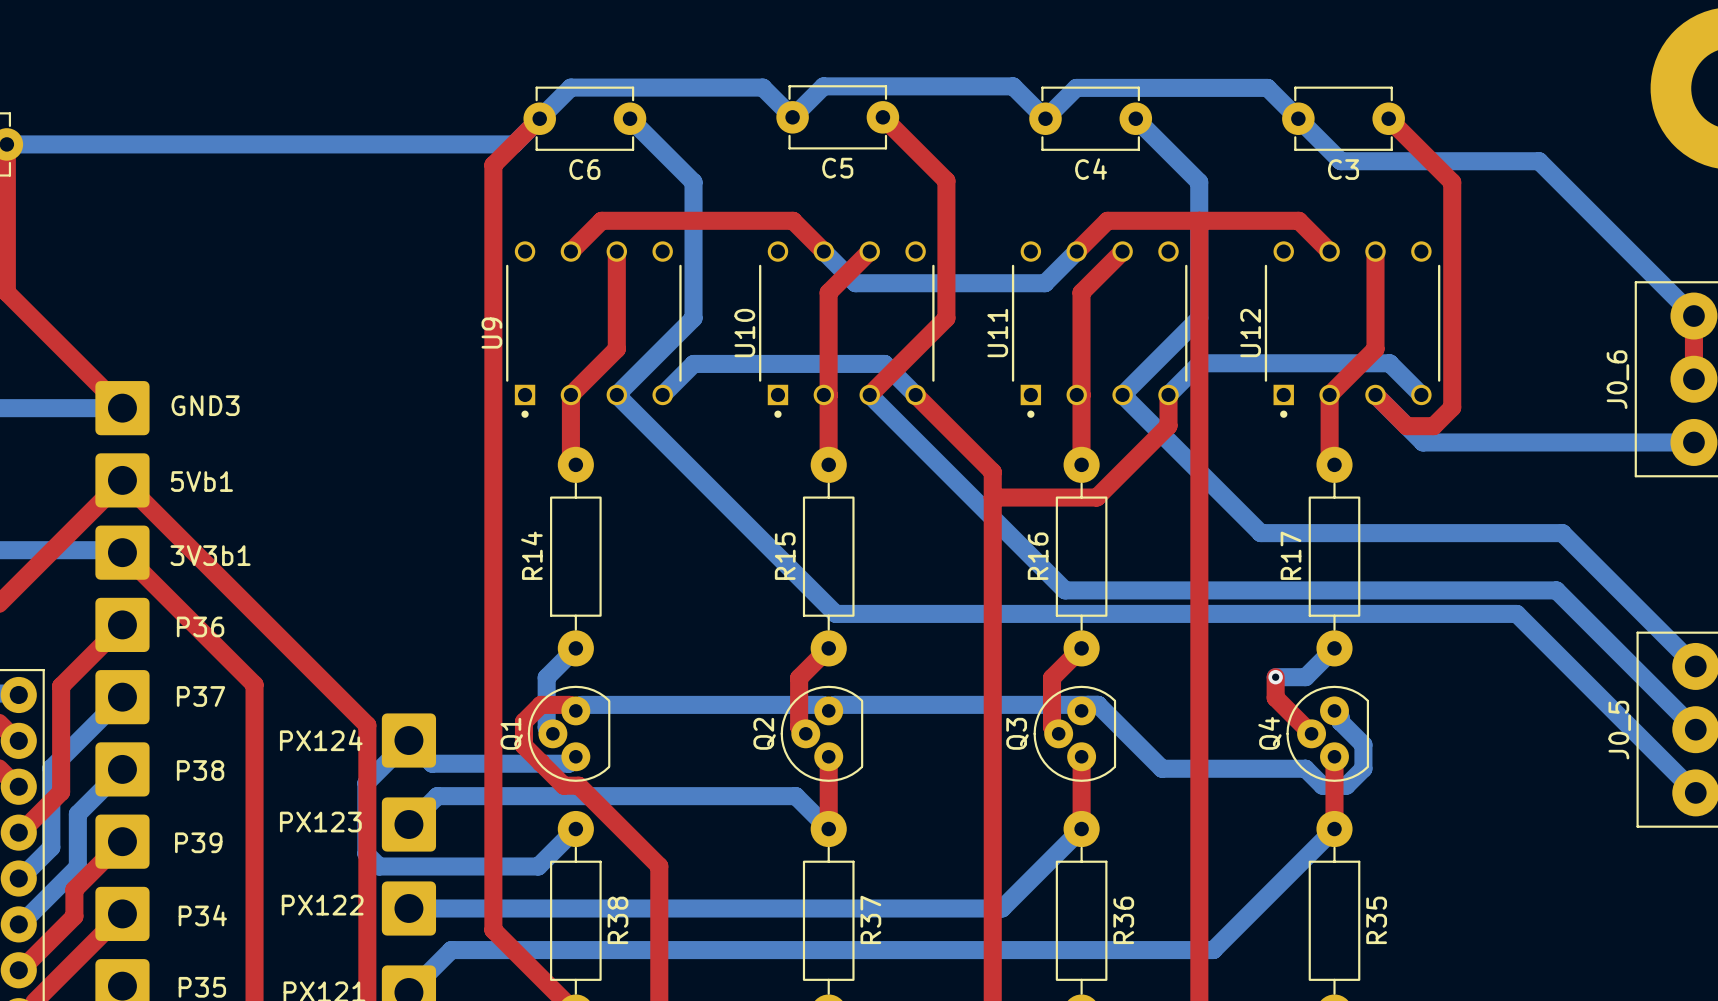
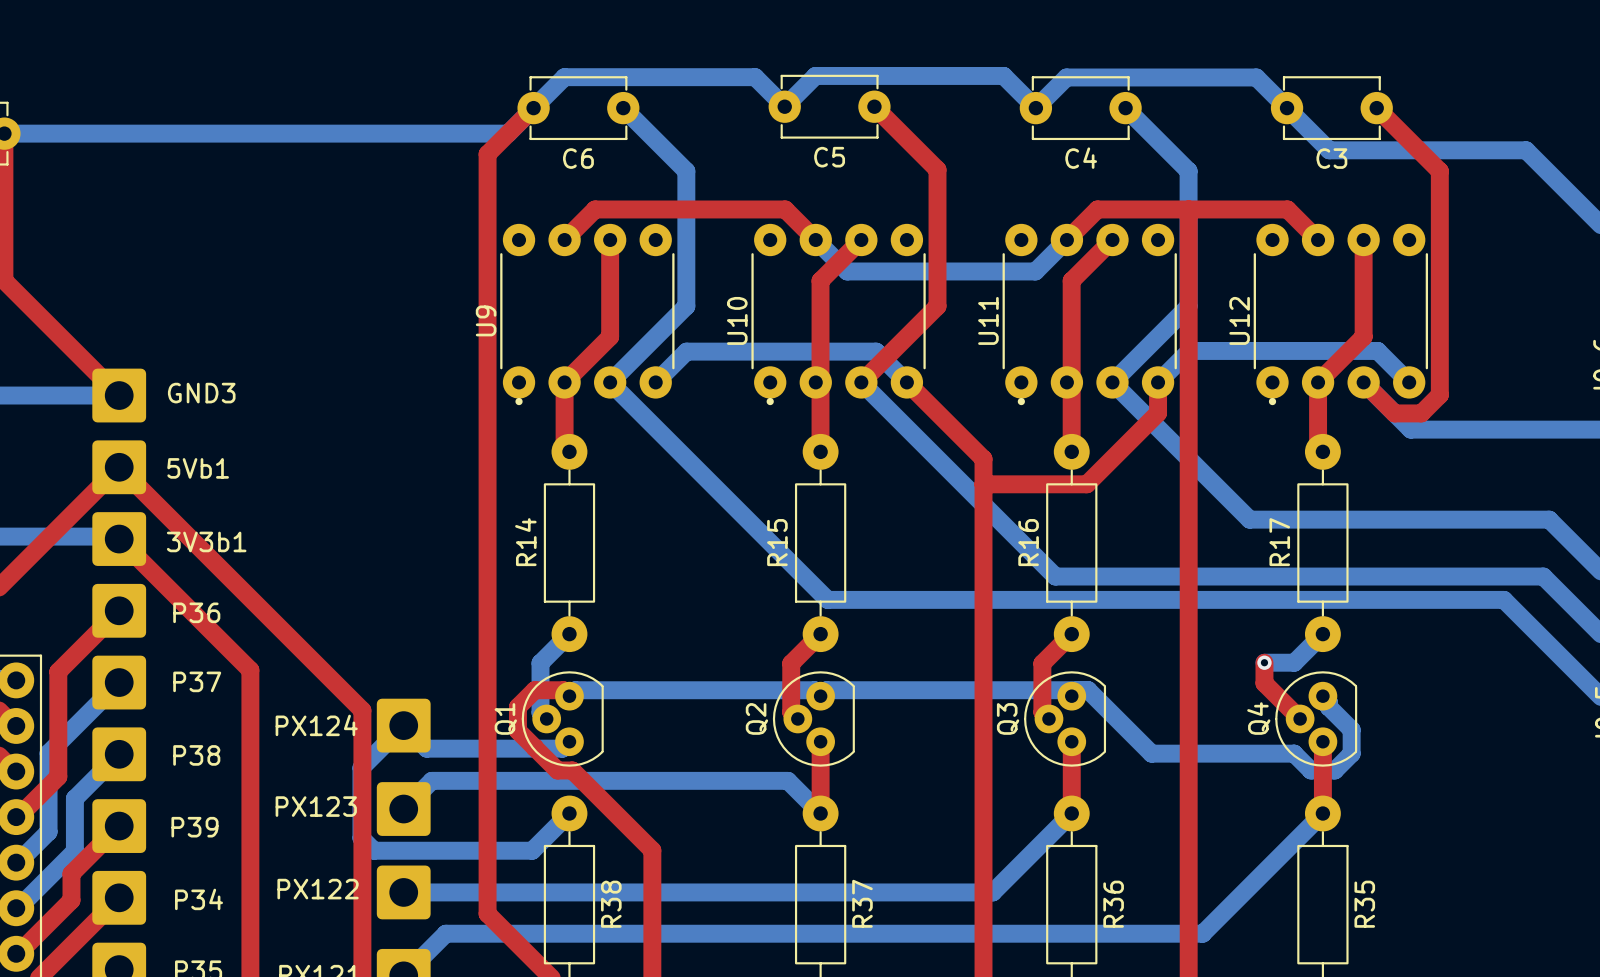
U9 footprint: [506, 241, 682, 418] -> [500, 223, 675, 406]
U10 footprint: [759, 241, 935, 418] -> [751, 223, 926, 406]
U11 footprint: [1011, 241, 1188, 418] -> [1002, 223, 1177, 406]
U12 footprint: [1264, 241, 1441, 418] -> [1253, 223, 1429, 406]

